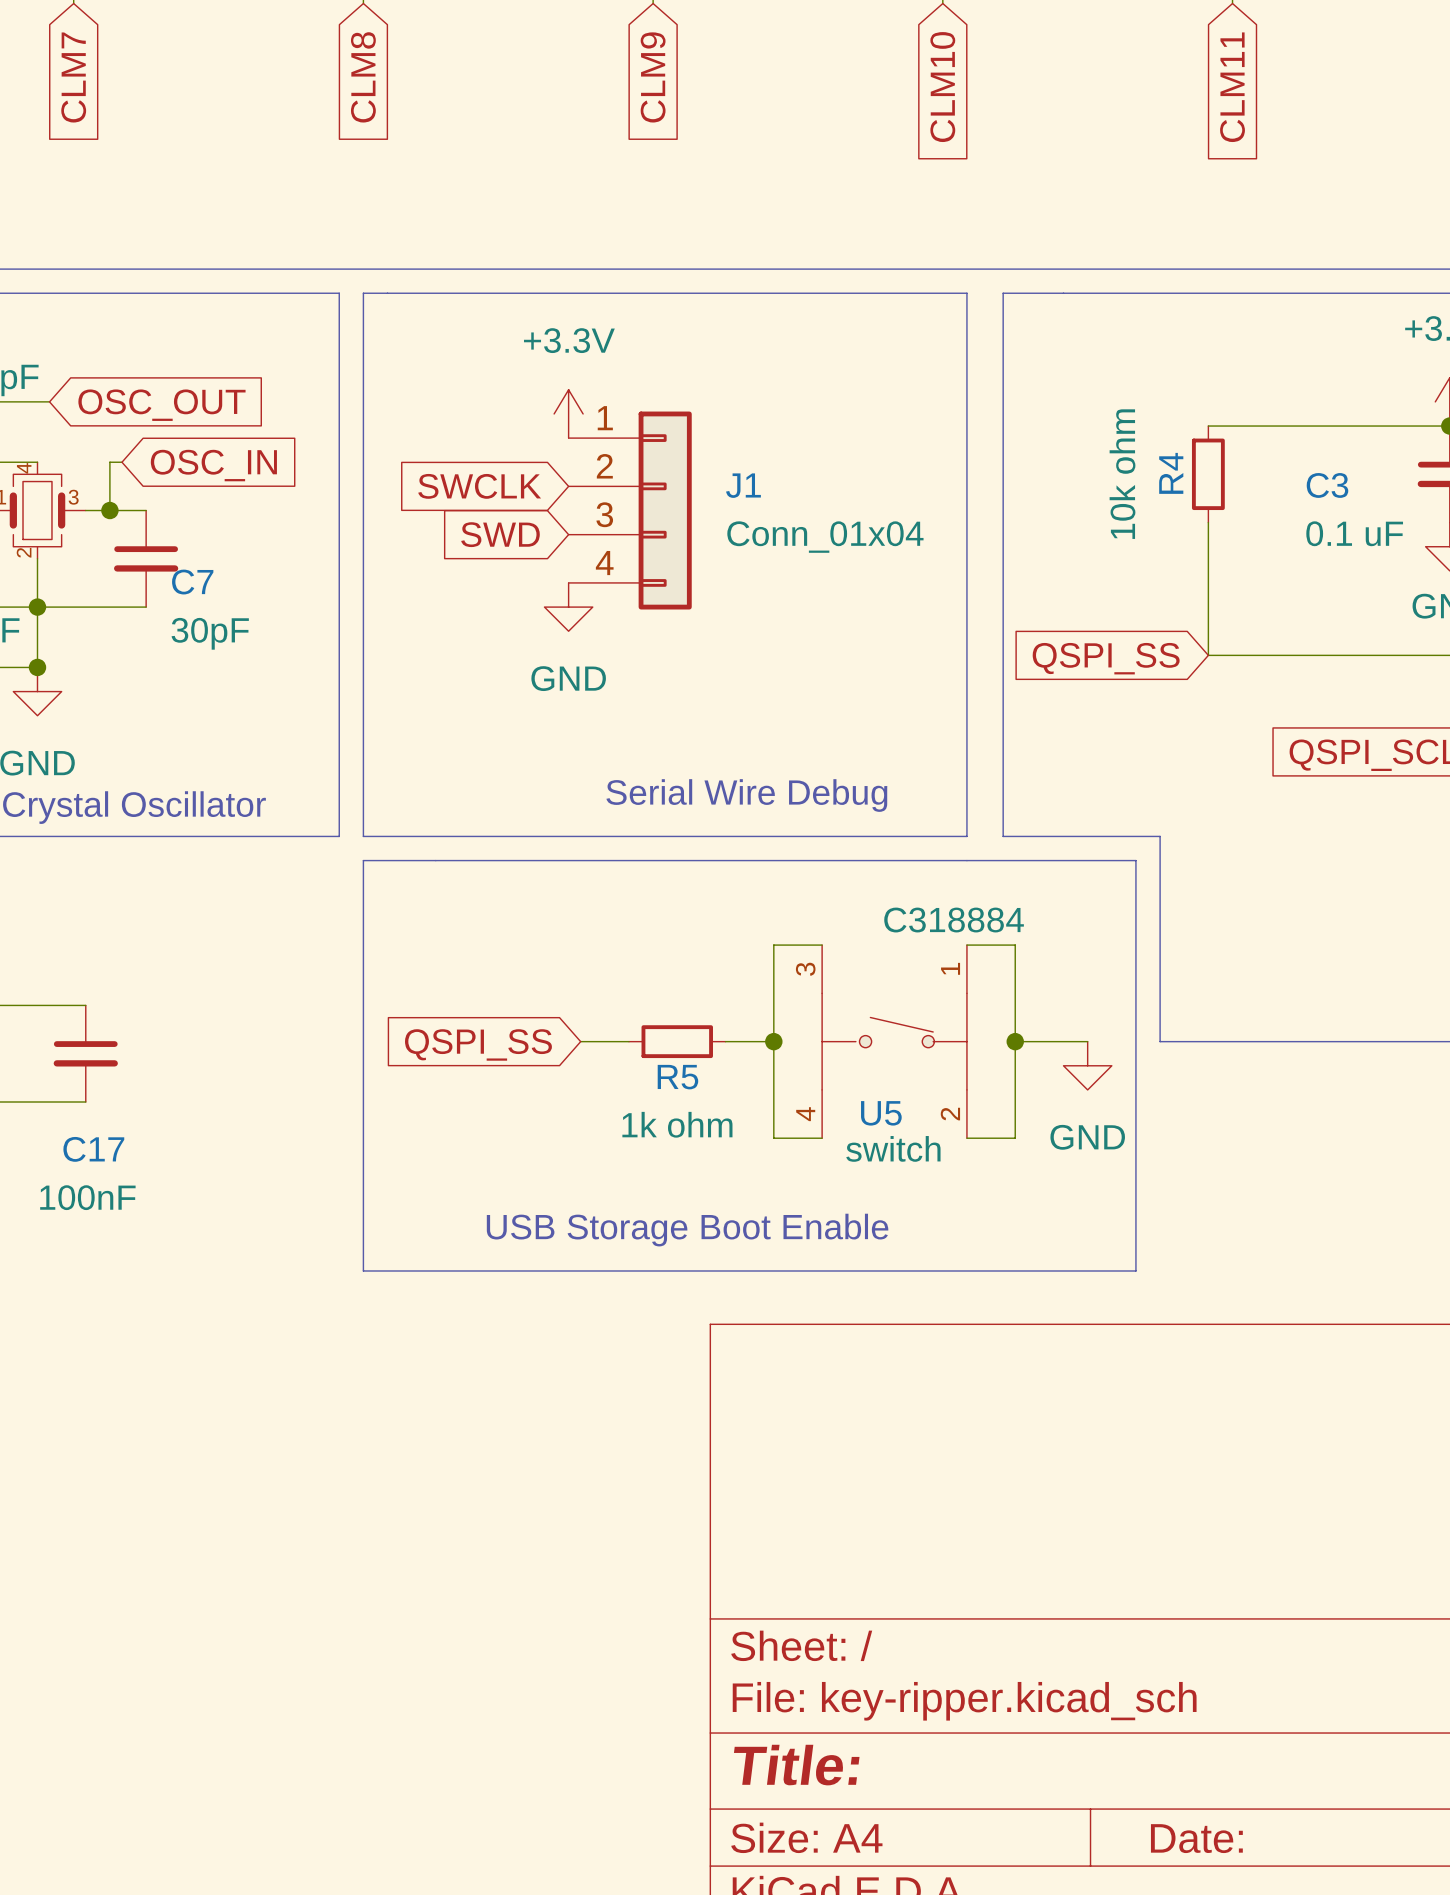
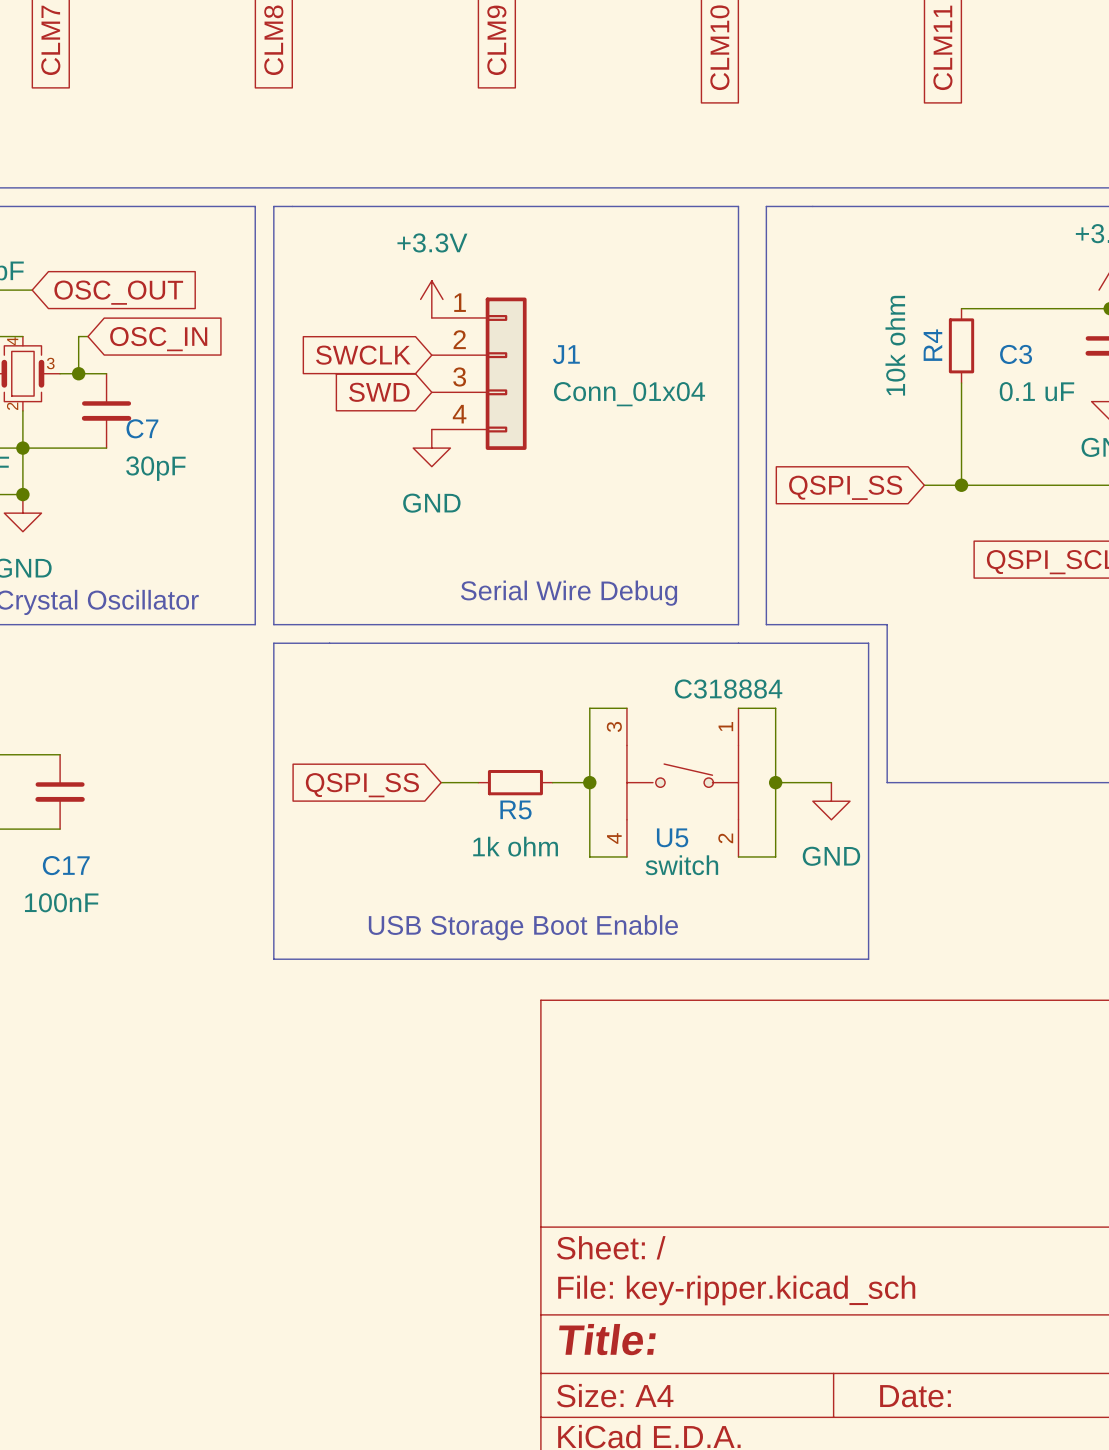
wire: (1208, 426) (1256, 426) -> none
R4 position: (1208, 474) -> (961, 345)
wire: (1208, 522) (1208, 655) -> (961, 383) (961, 485)
junction: none -> (961, 485)

